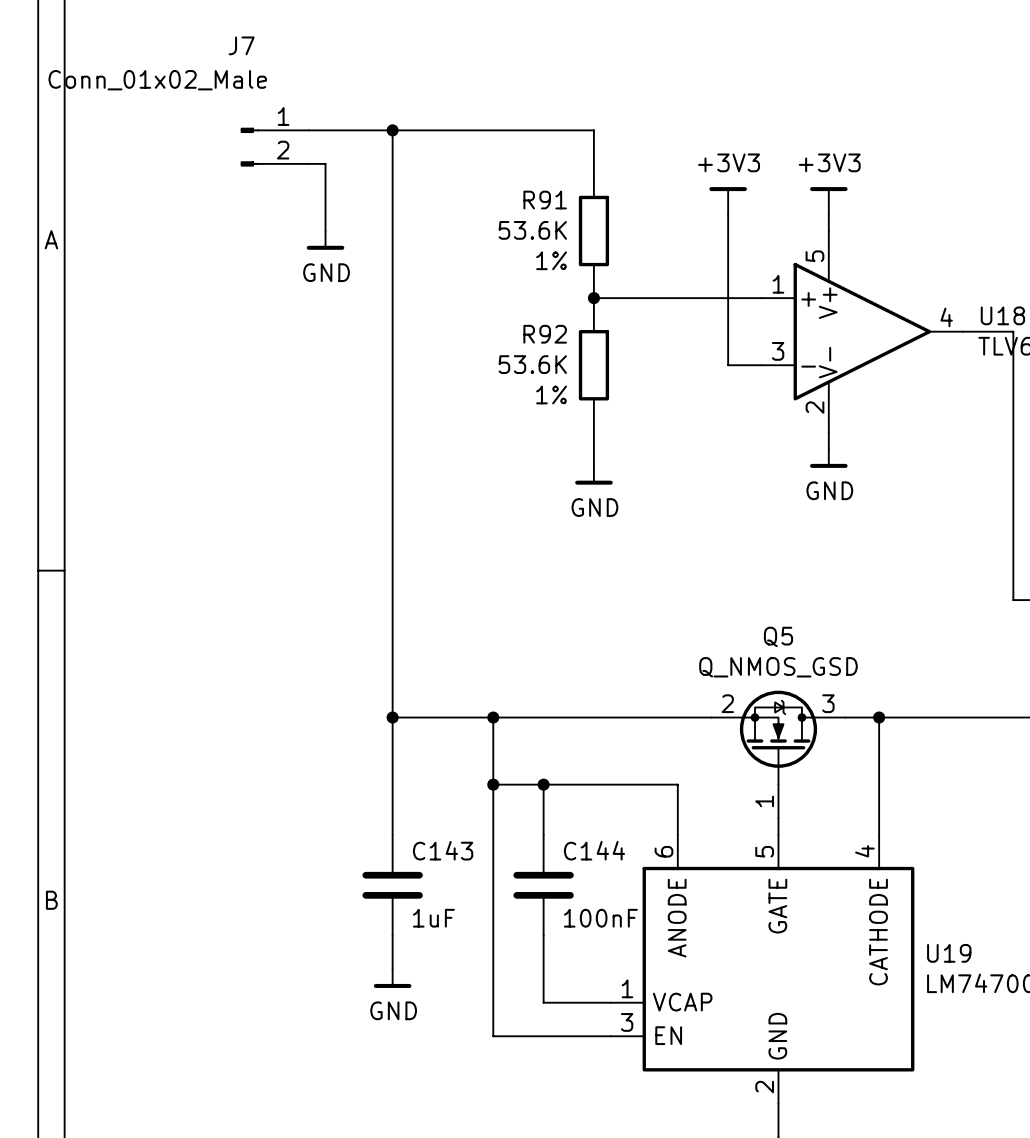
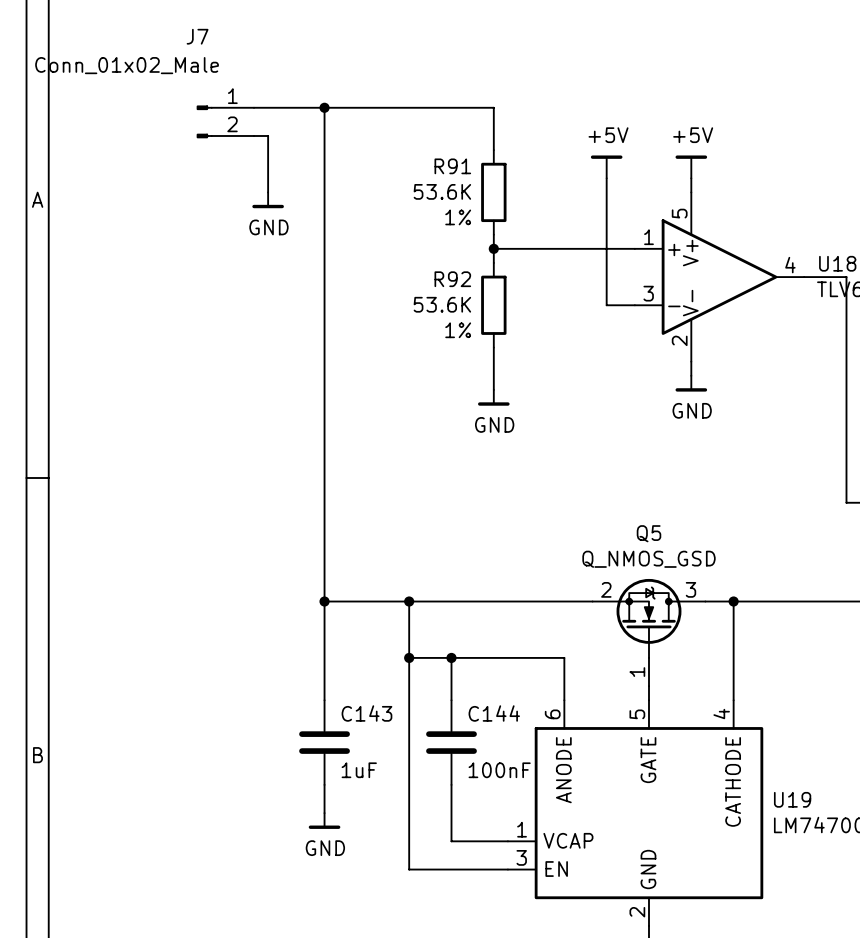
power symbol: +3V3 (728, 200) -> +5V (606, 166)
power symbol: +3V3 (828, 200) -> +5V (691, 166)

